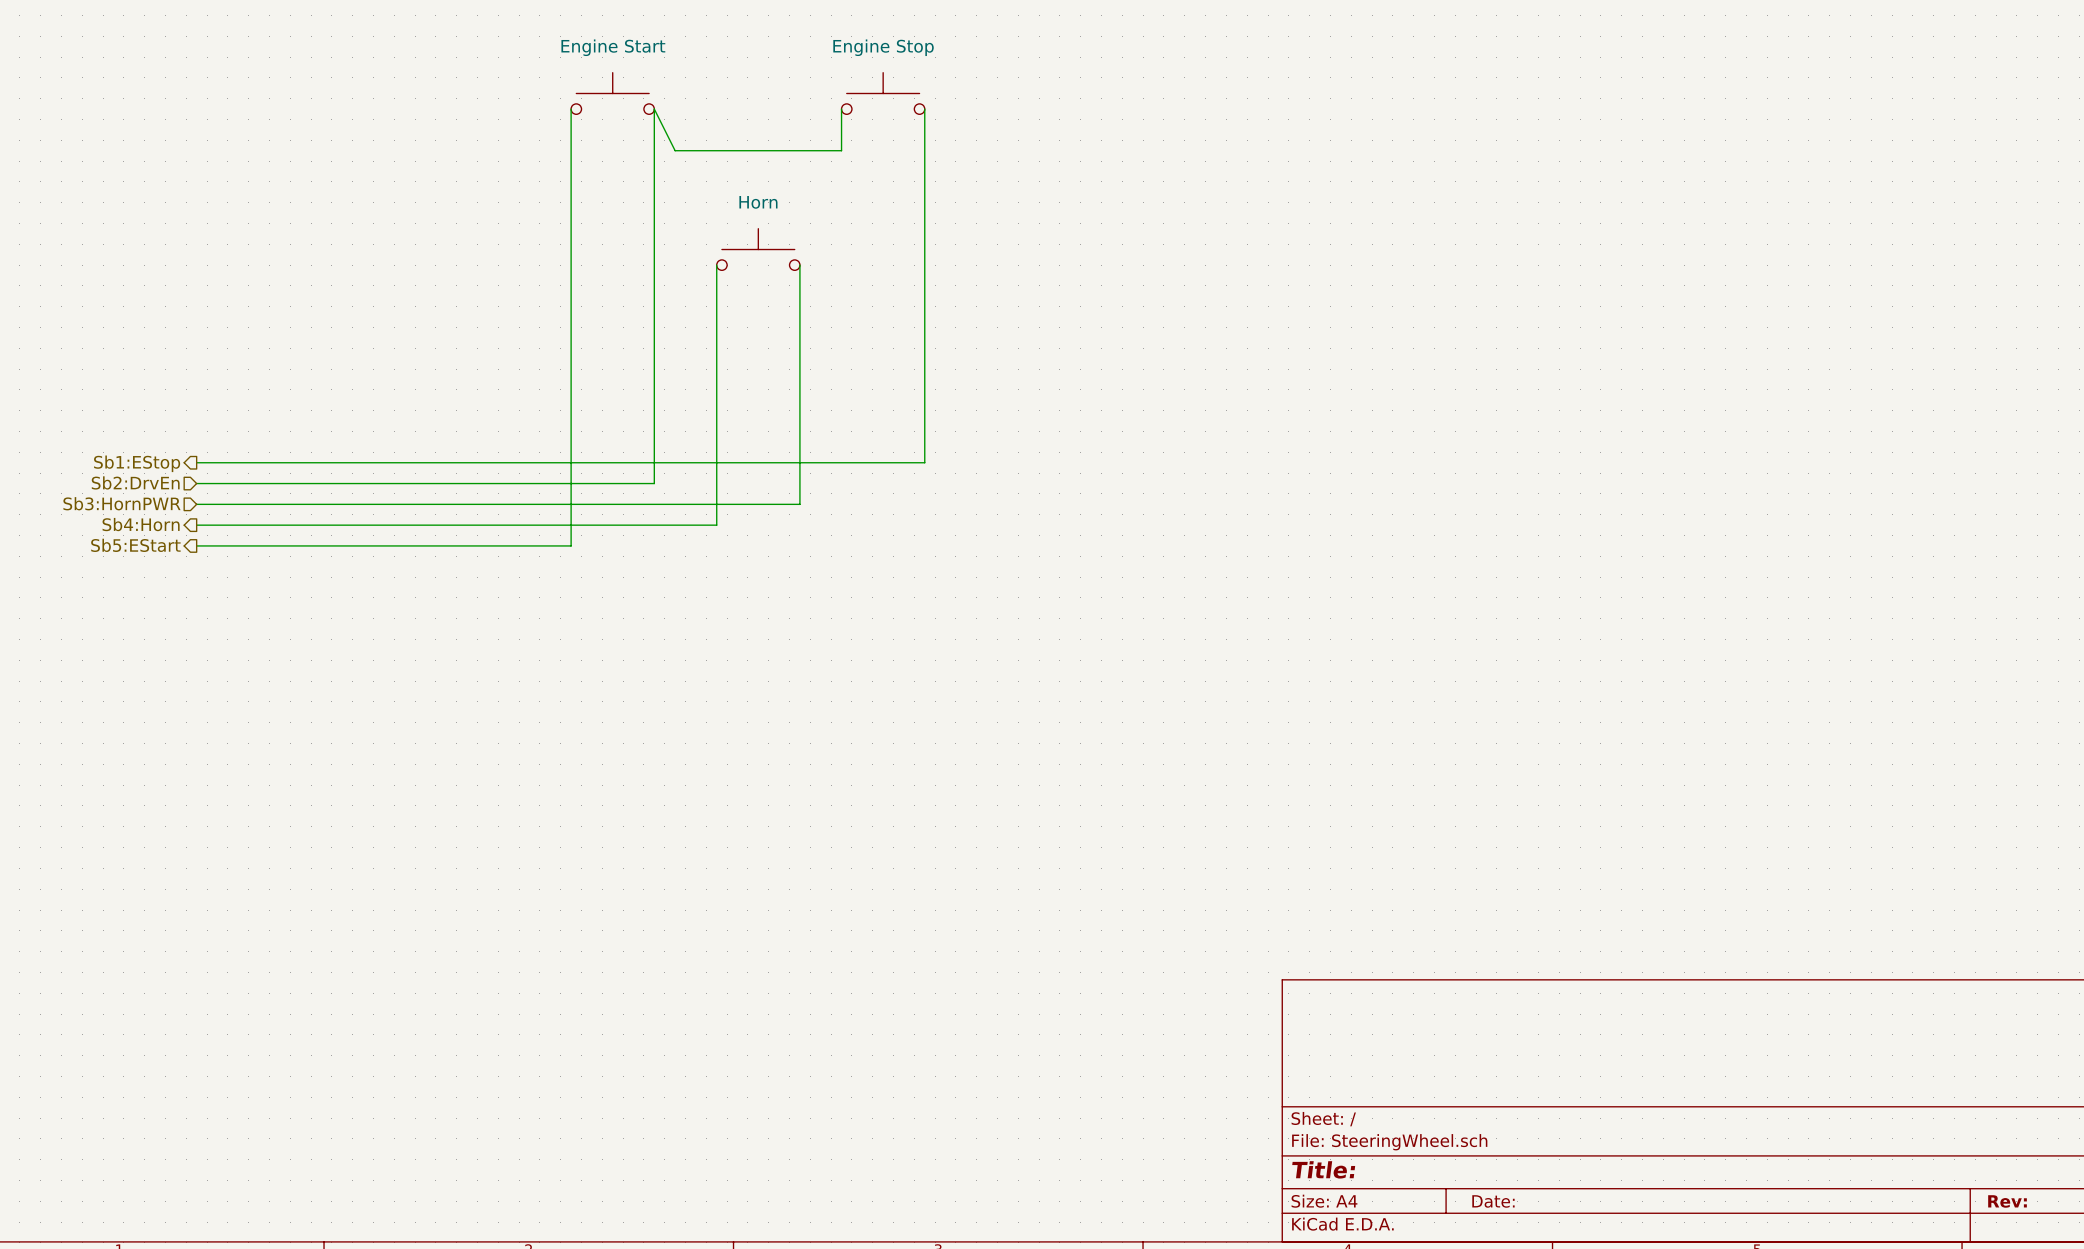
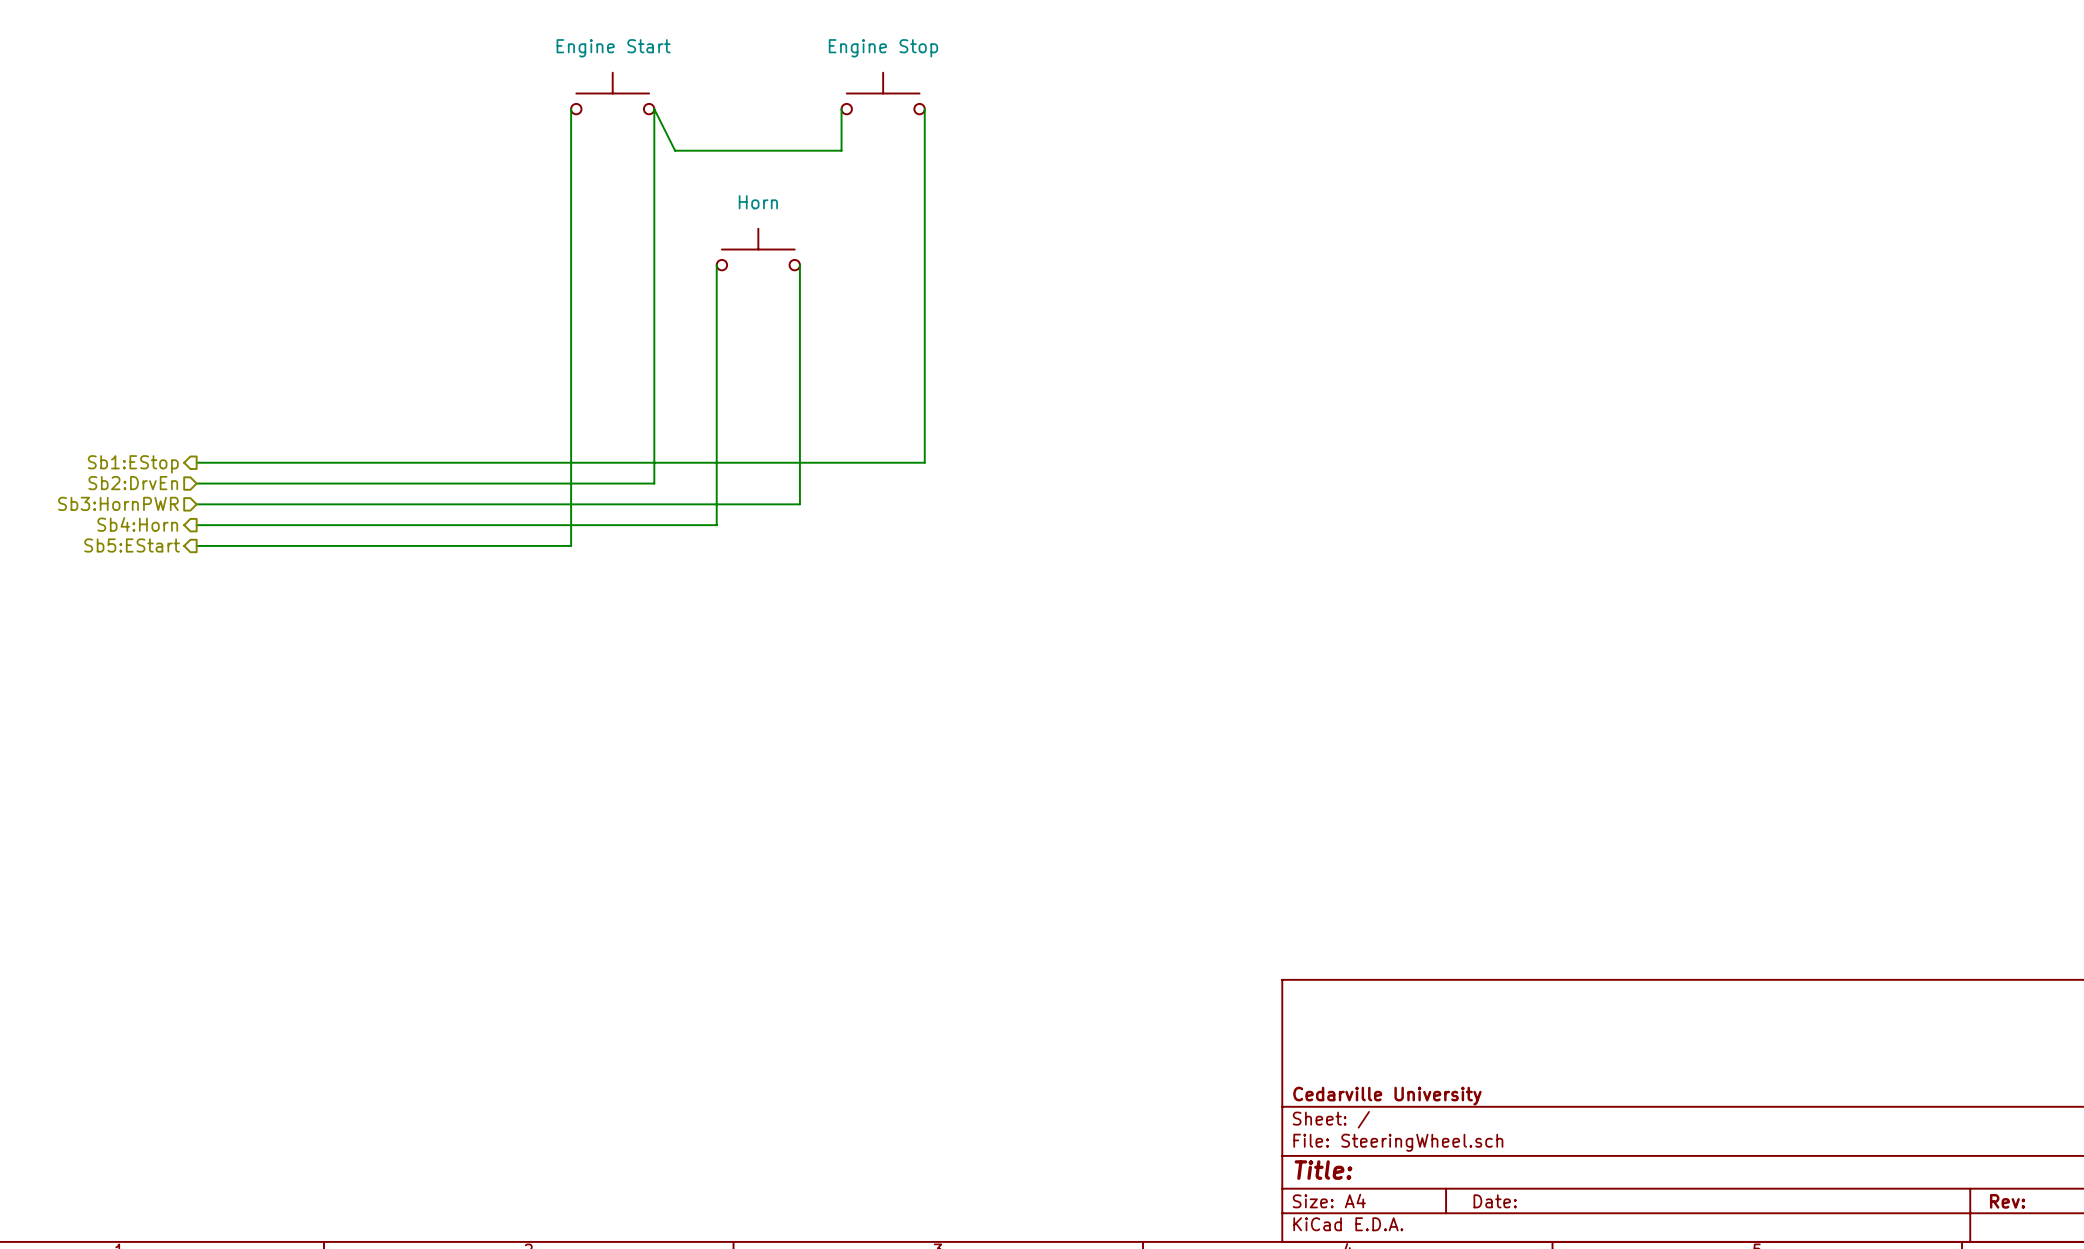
title block: none -> Cedarville University (1387, 1096)

